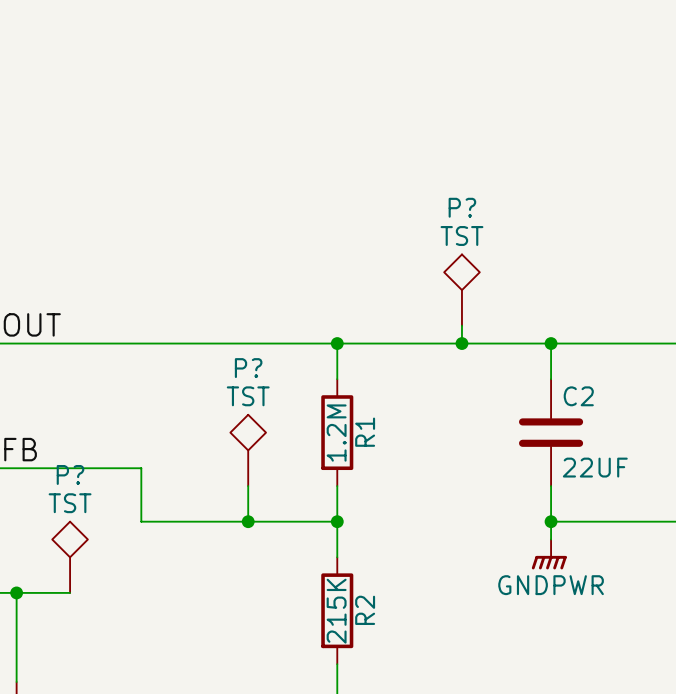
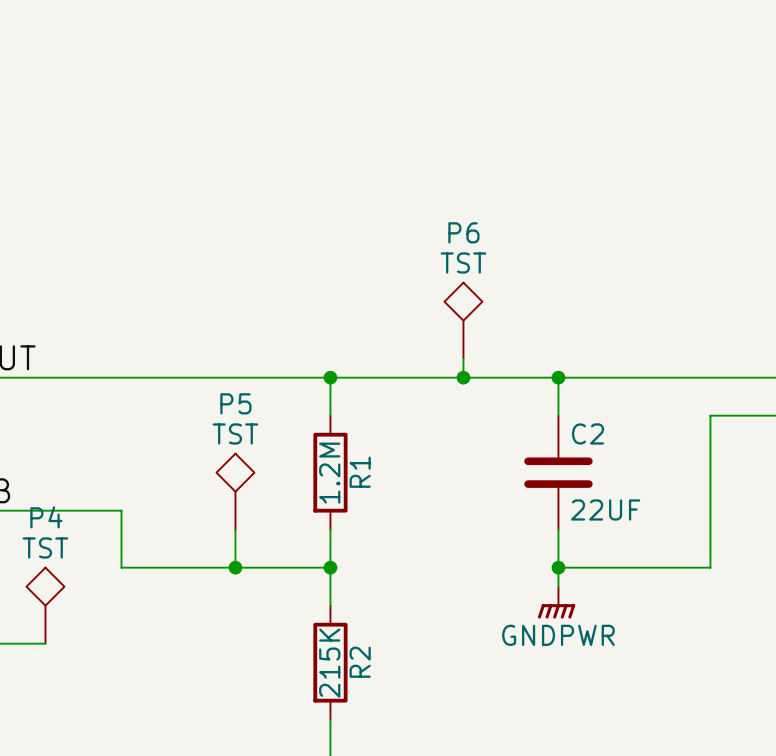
P? name: P? (462, 207) -> P6 (463, 232)
P? name: P? (248, 368) -> P5 (235, 403)
P? name: P? (70, 474) -> P4 (46, 517)

